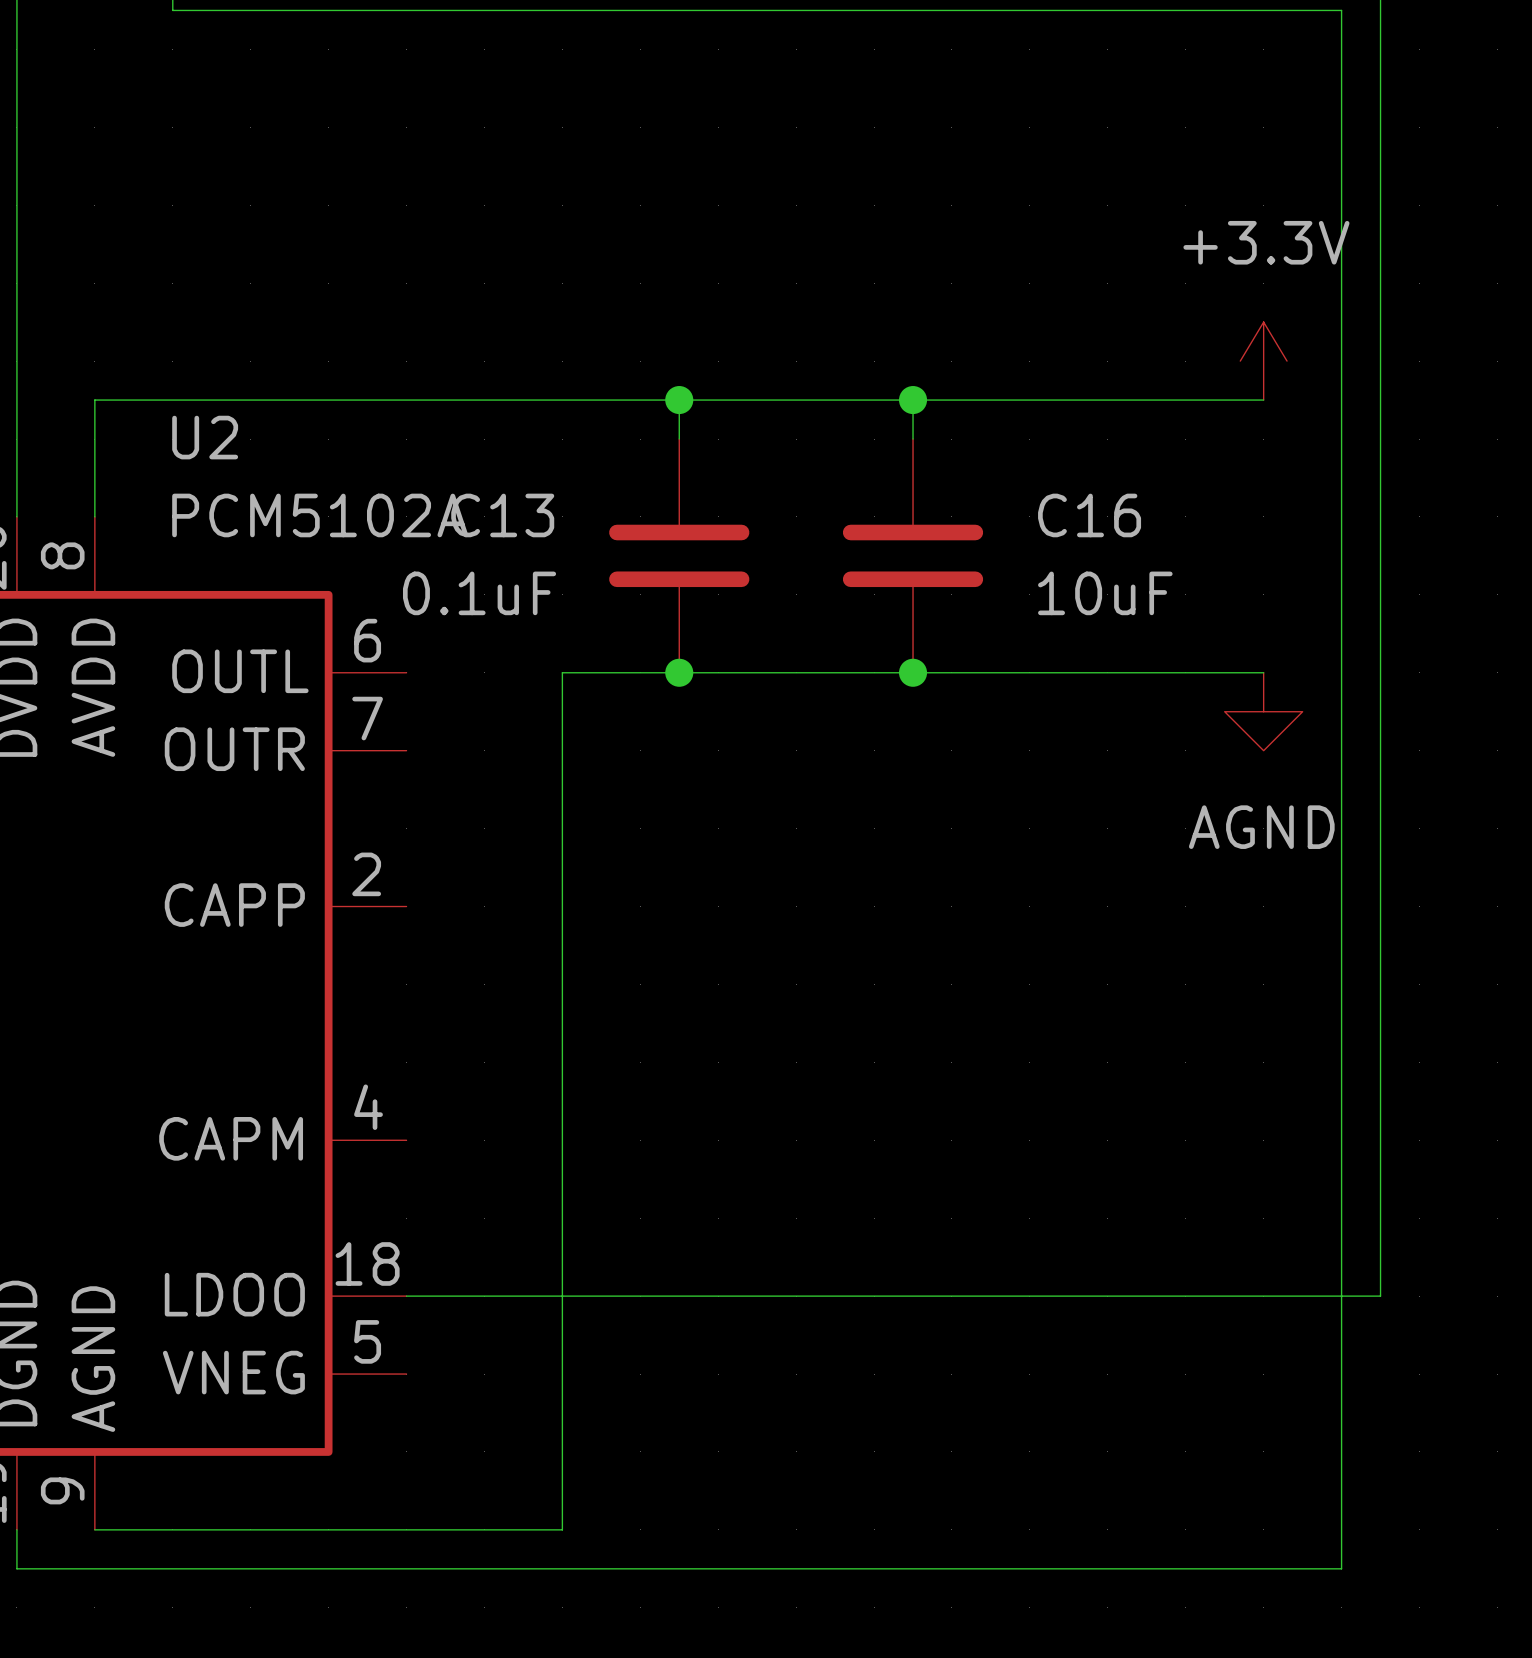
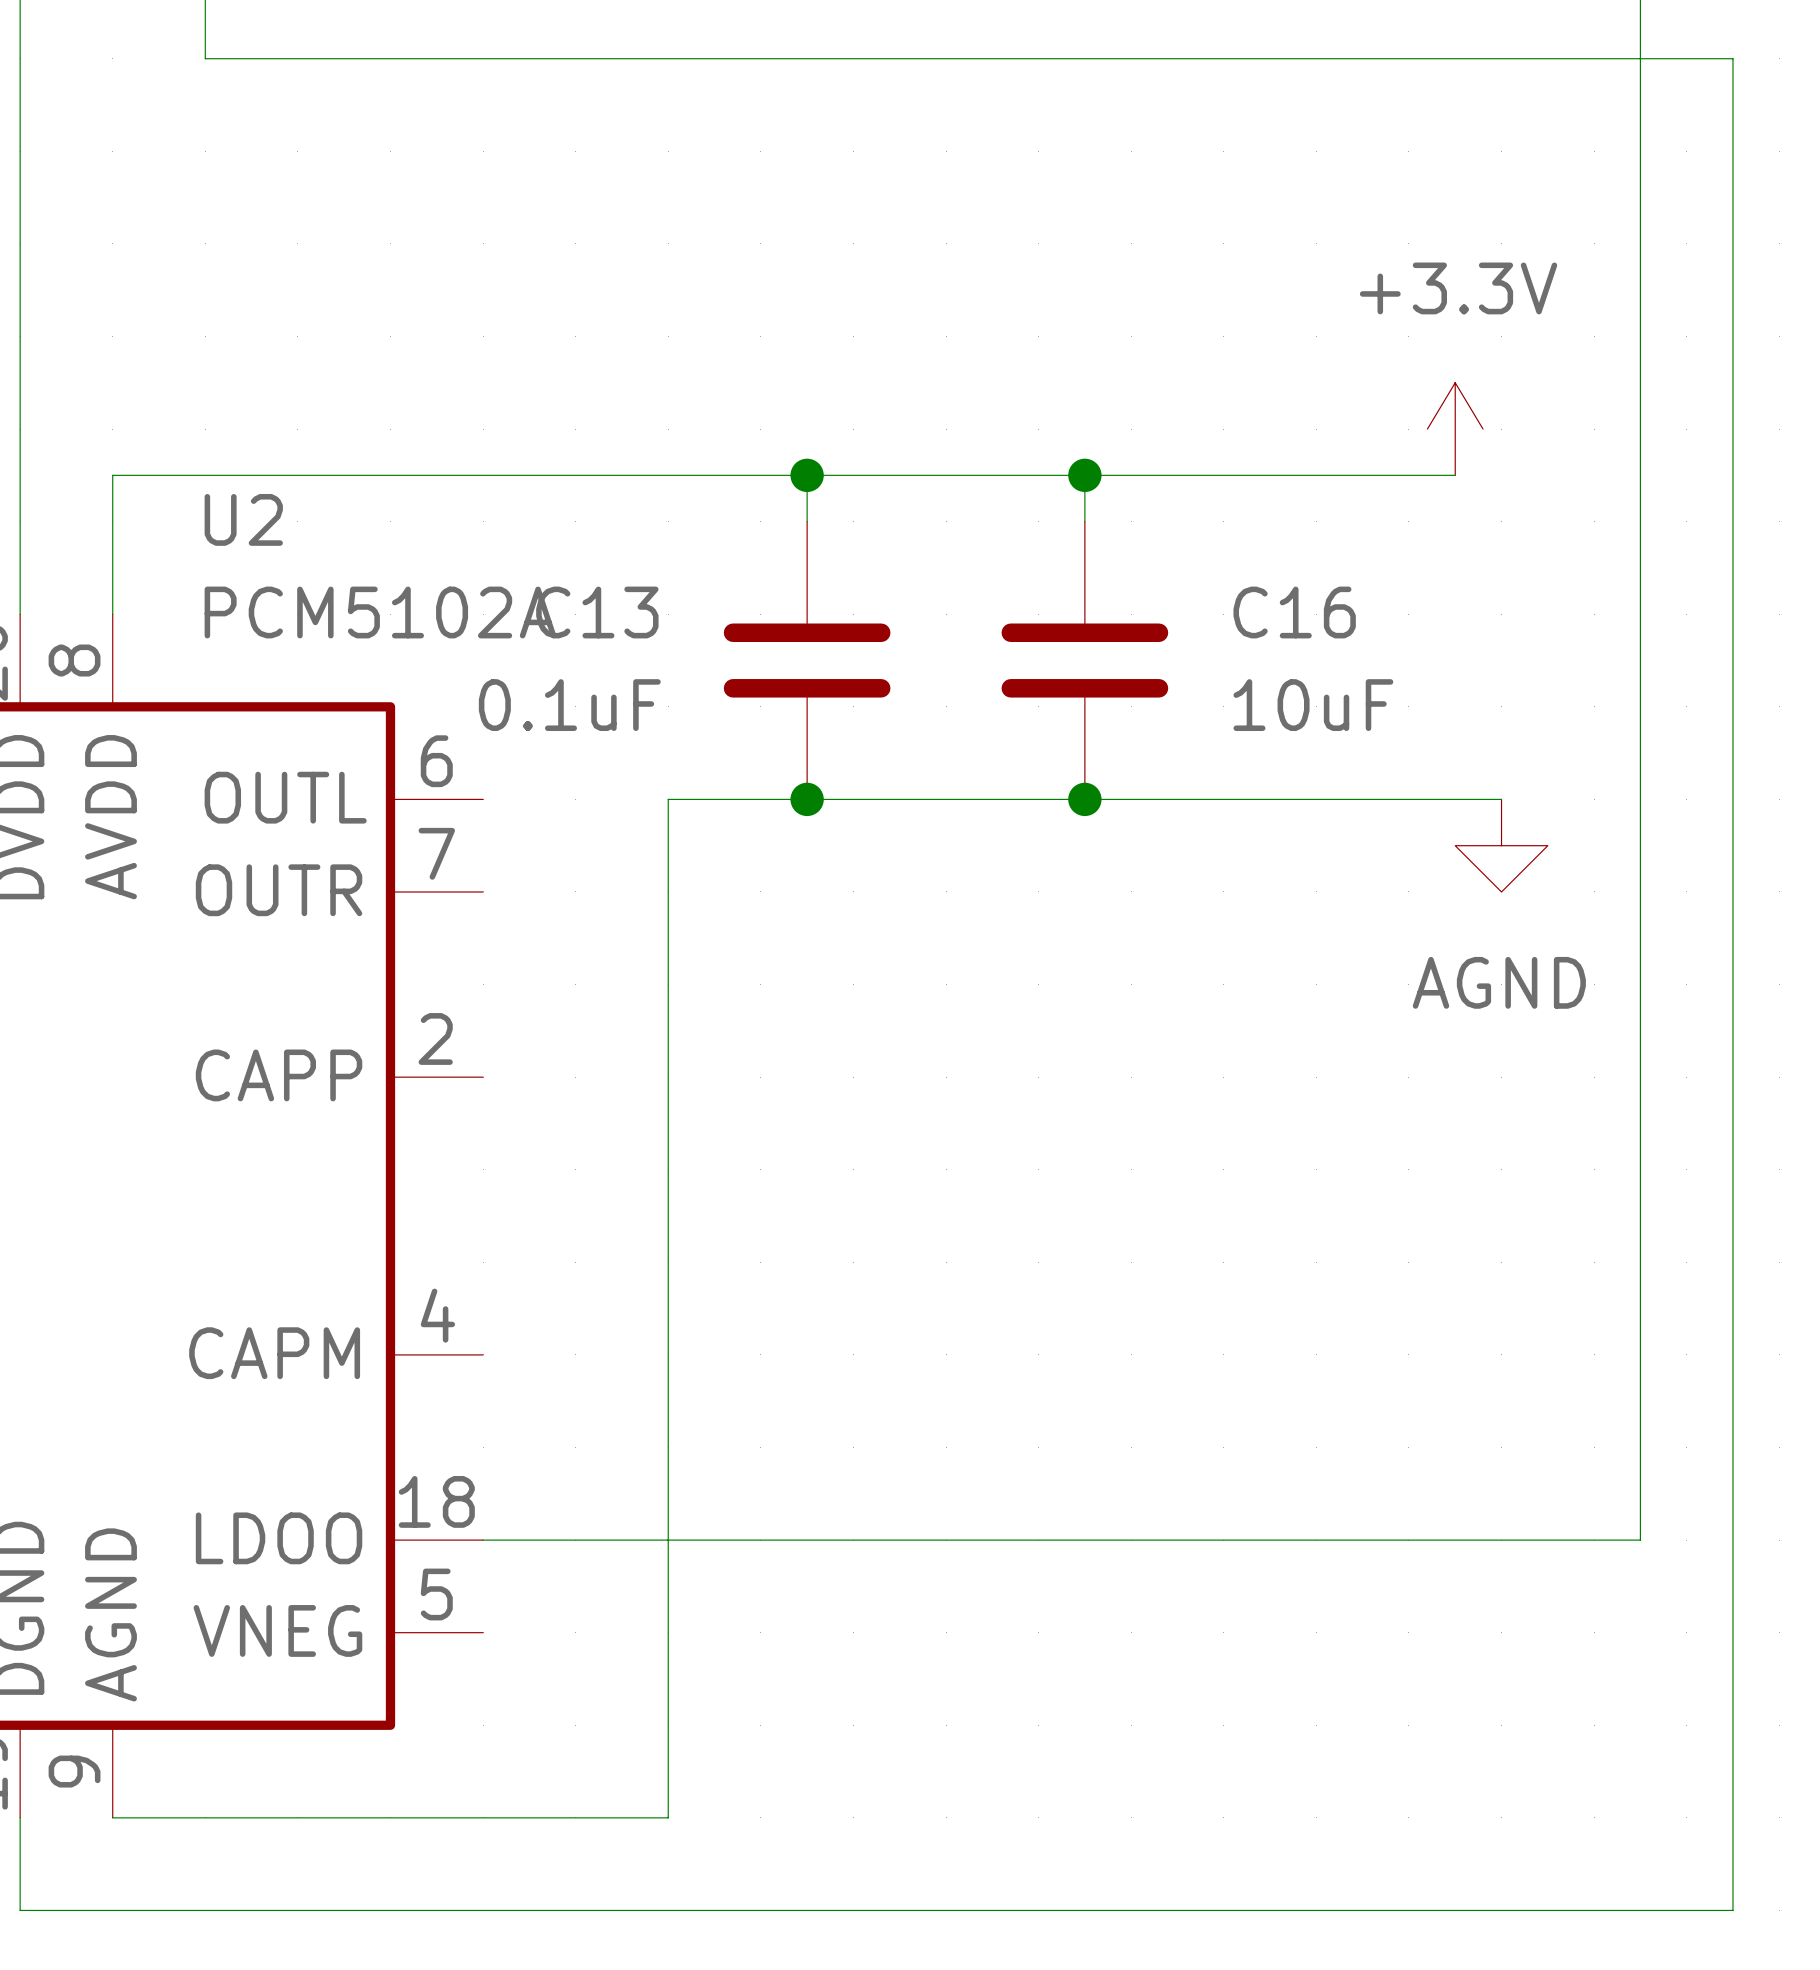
wire: (172, 10) (1341, 10) (1341, 1568) (16, 1568) -> (205, 12) (205, 58) (1732, 58) (1732, 1910) (20, 1910) (20, 1864)
power symbol position: +3.3V (1263, 361) -> +3.3V (1455, 429)
wire: (1224, 400) (1263, 400) -> none

